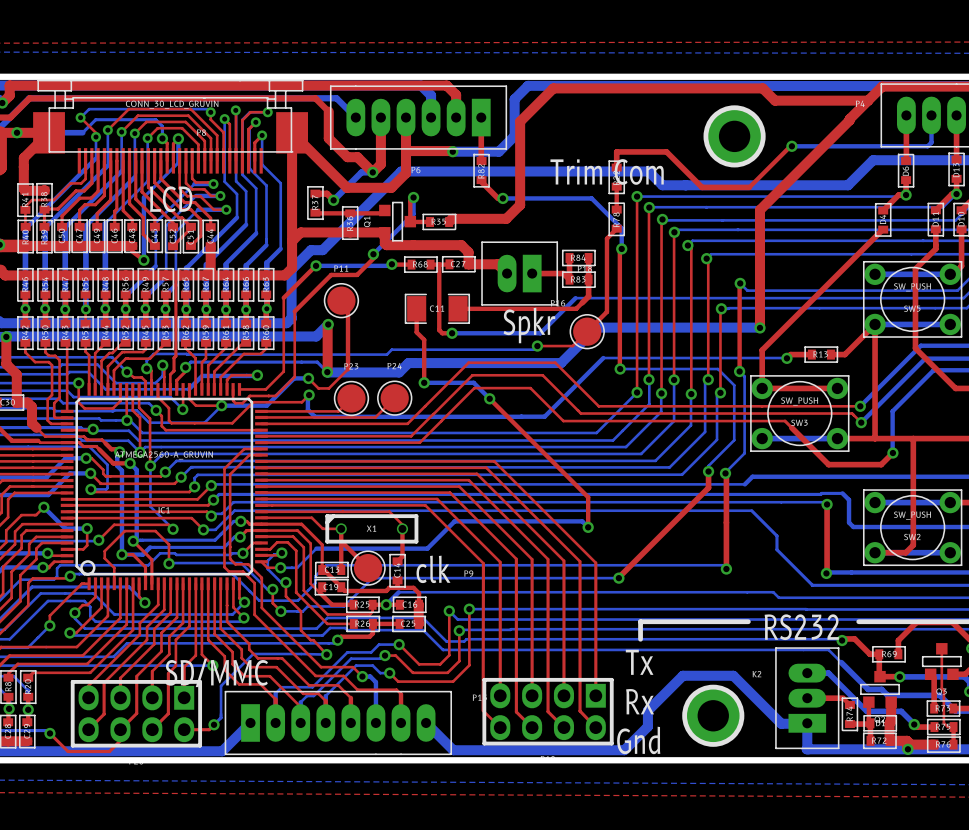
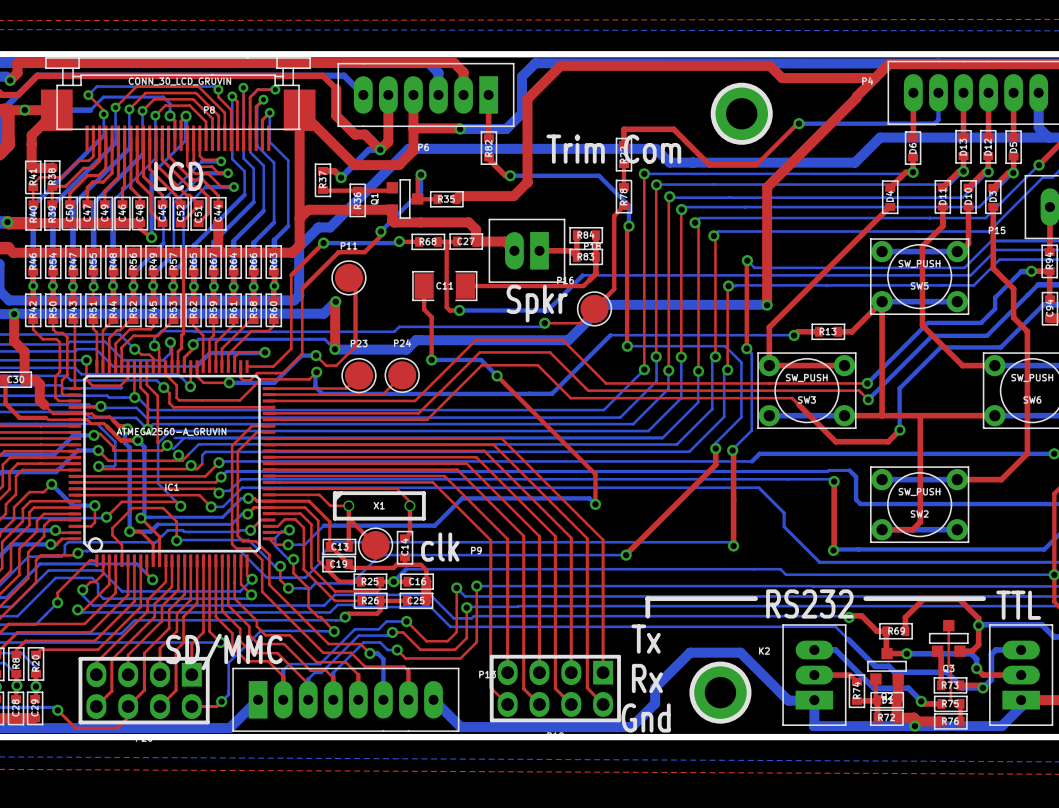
bottom track: (221, 405) (204, 422) (149, 422) (136, 410) (114, 410) -> none
top track: none -> (98, 433) (113, 447) (113, 450) (162, 450) (167, 445)
top track: (86, 458) (91, 458) (103, 469) (105, 476) (161, 476) (165, 472) -> none
via: (150, 465) -> none
via: none -> (167, 445)
via: (165, 472) -> none
via: (181, 477) -> none
via: none -> (178, 455)
via: (194, 486) -> none
via: none -> (191, 465)

